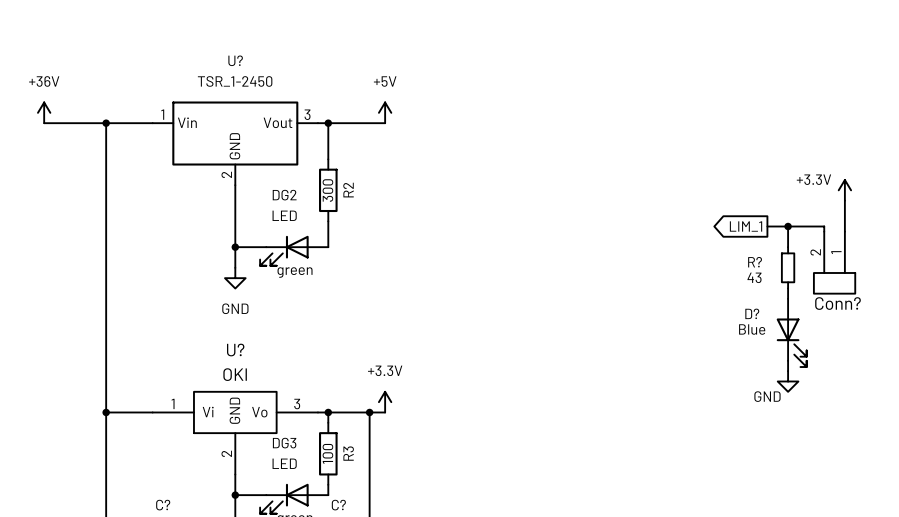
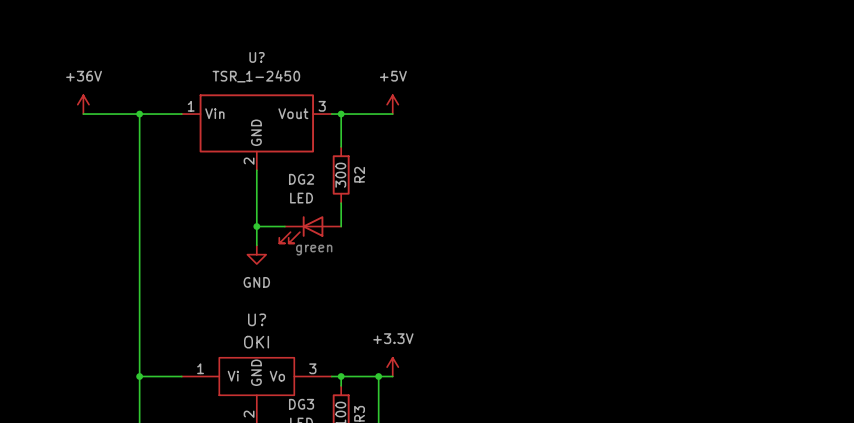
power symbol: +3.3V (844, 190) -> none
wire: (844, 200) (844, 231) -> none
global label: LIM_1 (746, 226) -> none
wire: (767, 226) (824, 226) (824, 231) -> none
wire: (788, 226) (788, 247) -> none
junction: (788, 226) -> none
Conn?: (834, 262) -> none
R?: 43 (788, 267) -> none
wire: (788, 288) (788, 298) -> none
D?: Blue (791, 332) -> none
wire: (788, 360) (788, 371) -> none
power symbol: GND (788, 381) -> none

